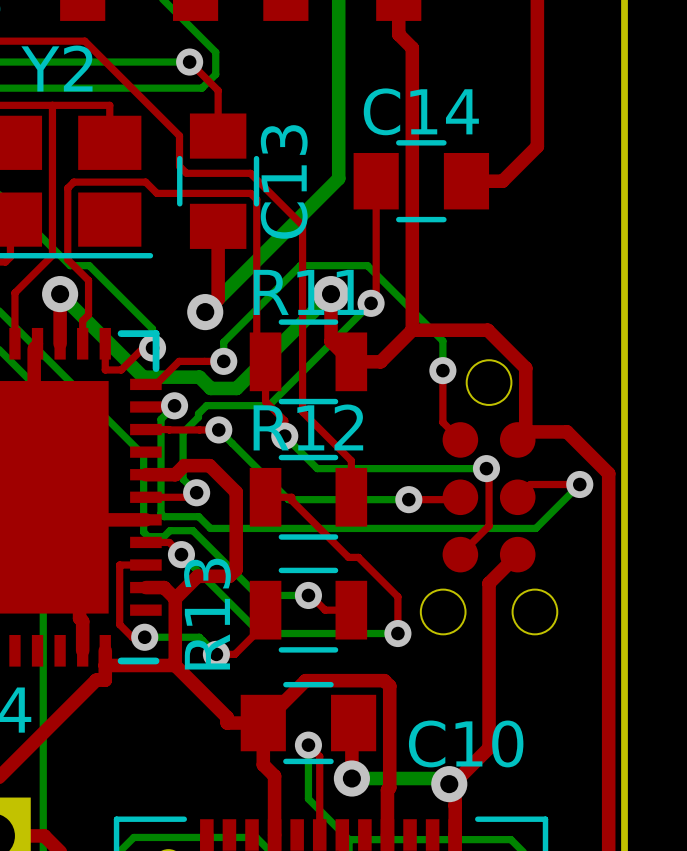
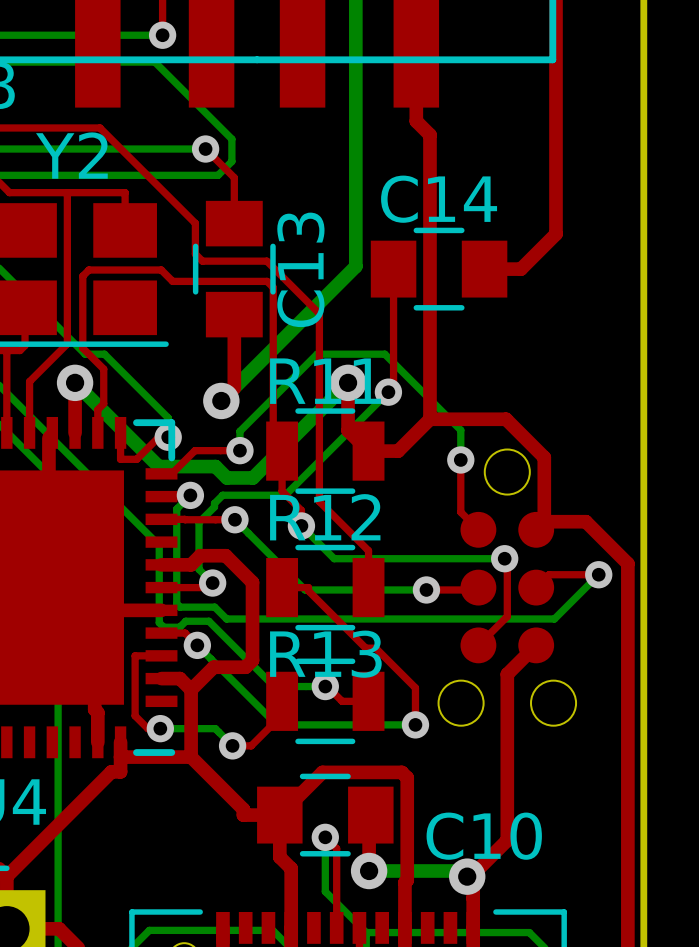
R13 name rotation: 0° (207, 614) -> 90° clockwise (325, 654)

